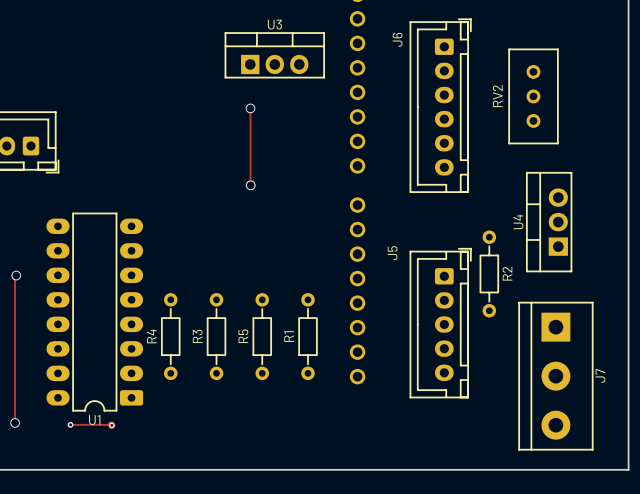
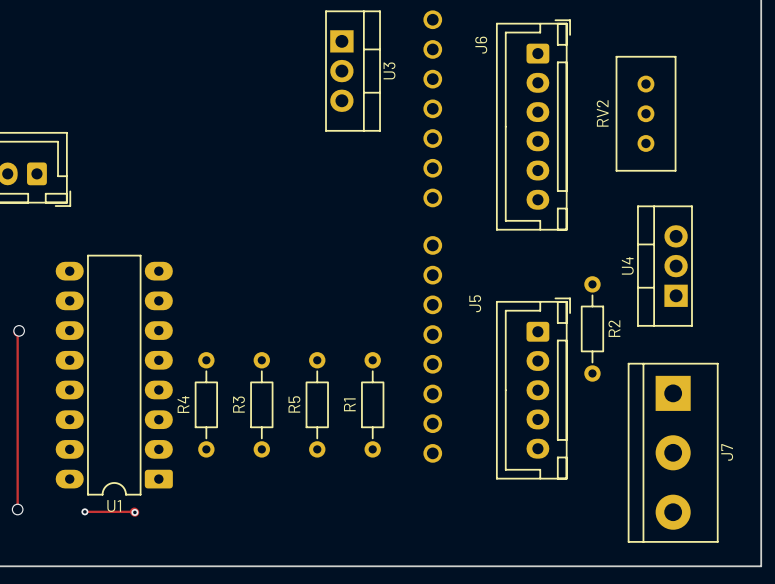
U3 rotation: 0° (274, 55) -> 90° clockwise (353, 71)
track: (250, 108) (250, 185) -> none
via: (250, 108) -> none
via: (250, 185) -> none

